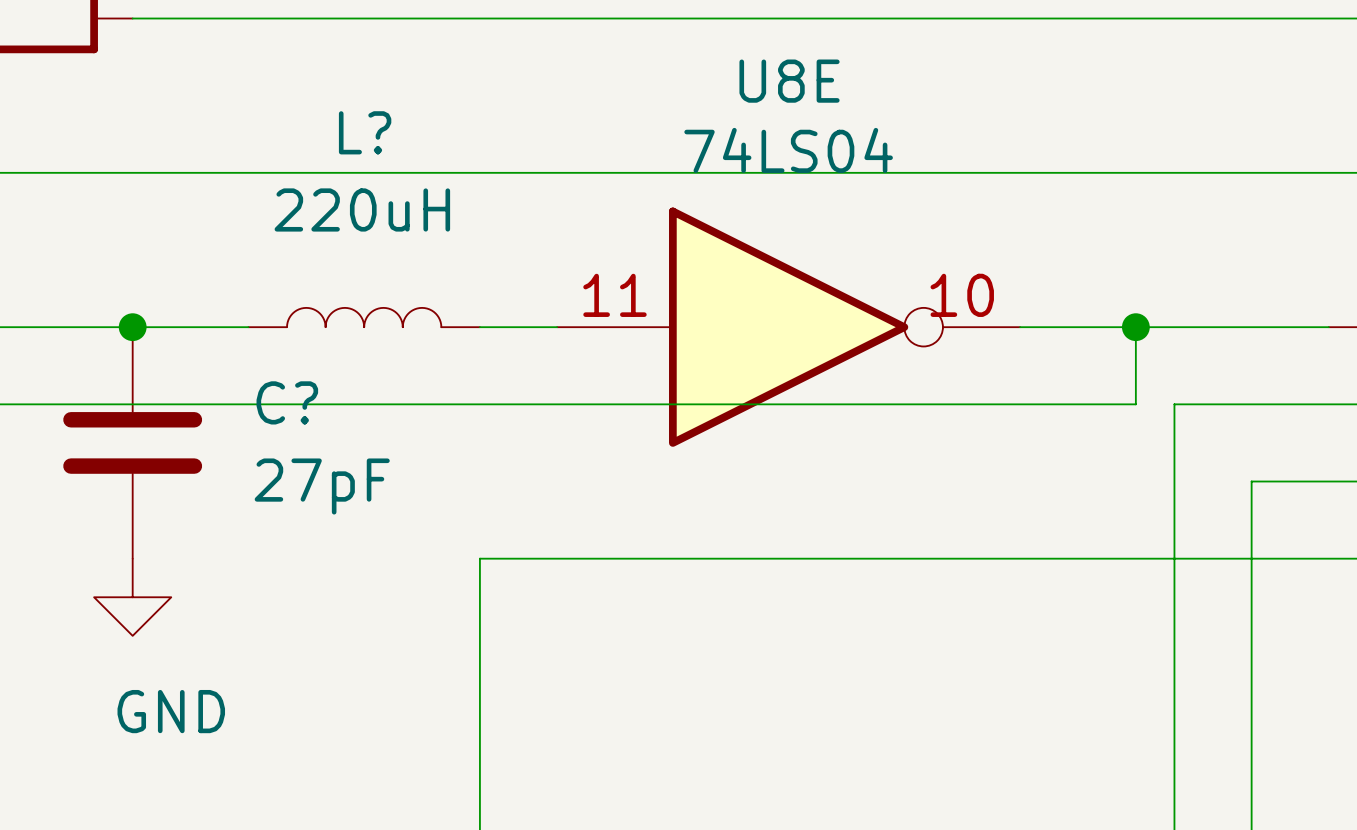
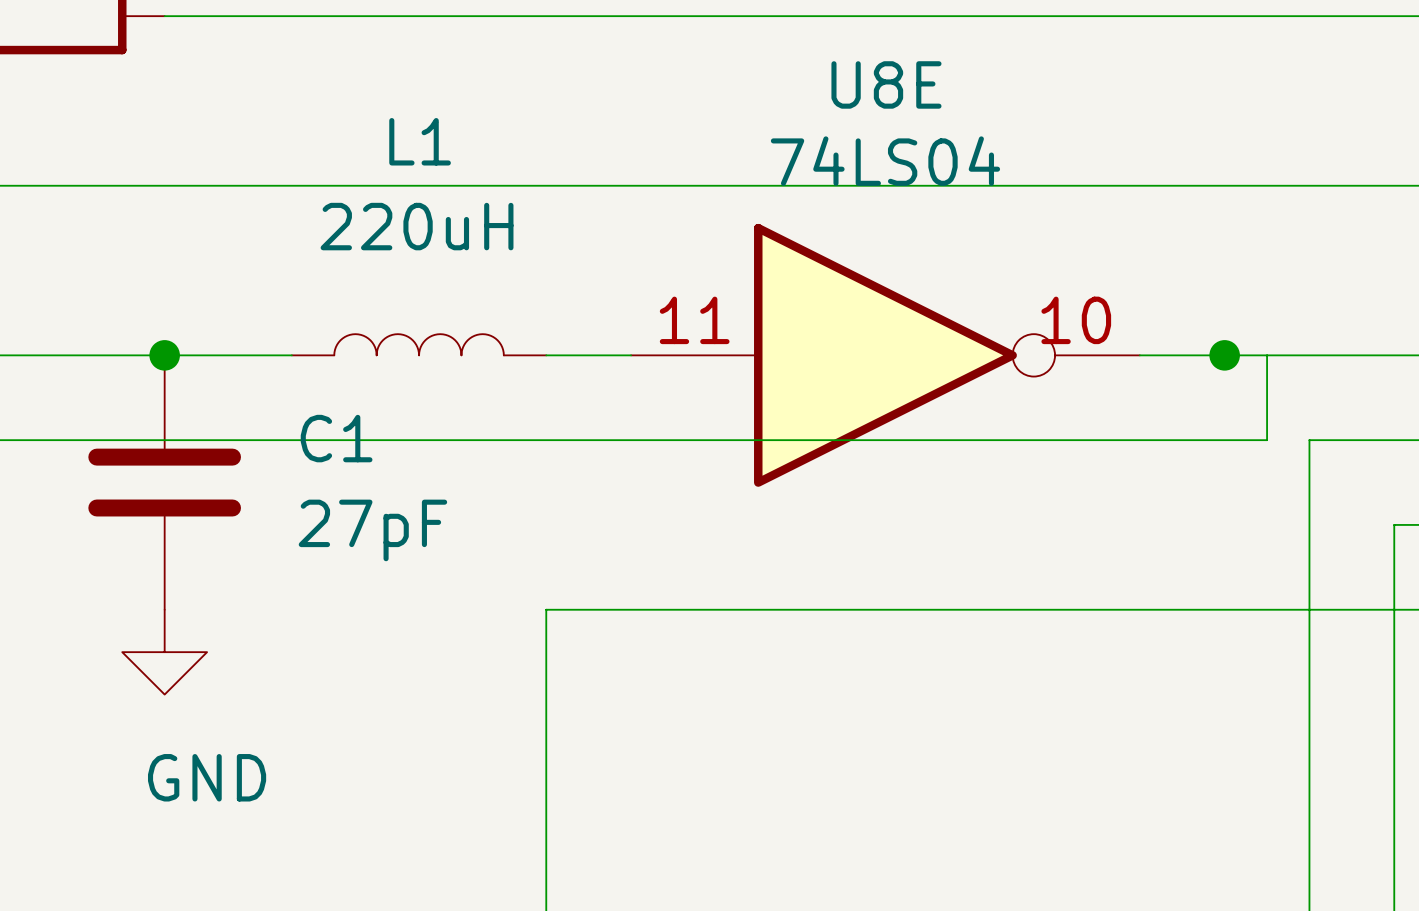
L? name: L? (365, 132) -> L1 (420, 141)
junction position: (1135, 327) -> (1224, 355)
C? name: C? (287, 402) -> C1 (336, 438)

